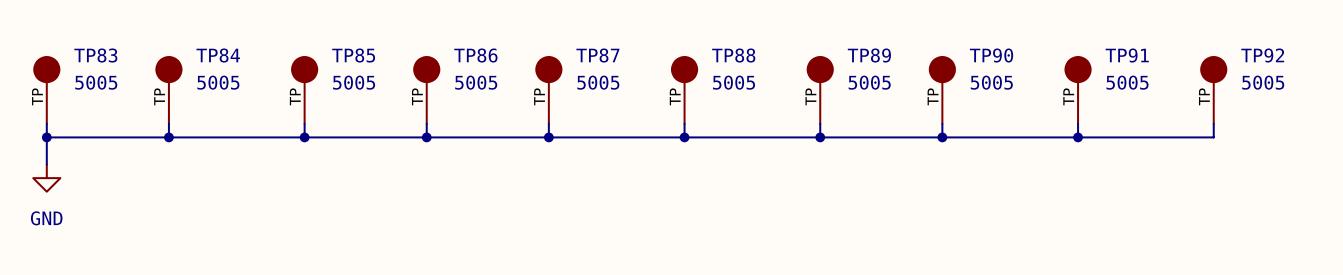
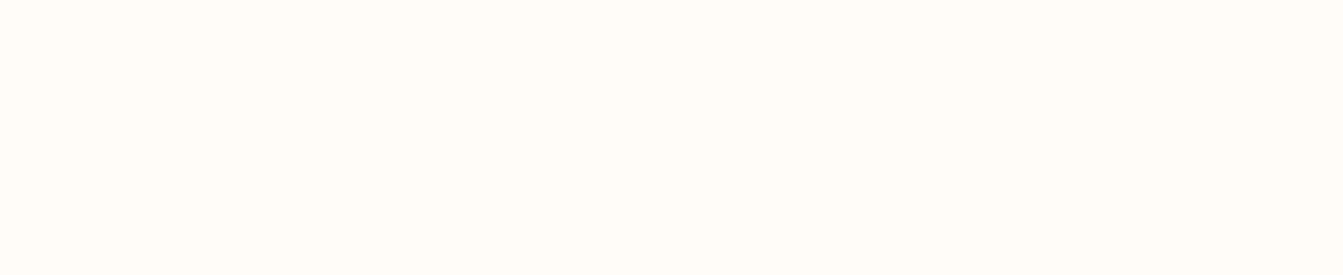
TP83: 5005 (46, 89) -> none
TP84: 5005 (168, 89) -> none
TP85: 5005 (304, 89) -> none
TP86: 5005 (426, 89) -> none
TP87: 5005 (548, 89) -> none
TP88: 5005 (684, 89) -> none
TP89: 5005 (820, 89) -> none
TP90: 5005 (942, 89) -> none
TP91: 5005 (1078, 89) -> none
TP92: 5005 (1213, 89) -> none
wire: (46, 123) (46, 164) -> none
wire: (168, 123) (168, 137) -> none
wire: (304, 123) (304, 137) -> none
wire: (426, 123) (426, 137) -> none
wire: (548, 123) (548, 137) -> none
wire: (684, 123) (684, 137) -> none
wire: (820, 123) (820, 137) -> none
wire: (942, 123) (942, 137) -> none
wire: (1078, 123) (1078, 137) -> none
wire: (1213, 123) (1213, 137) (46, 137) -> none
junction: (46, 137) -> none
junction: (168, 137) -> none
junction: (304, 137) -> none
junction: (426, 137) -> none
junction: (548, 137) -> none
junction: (684, 137) -> none
junction: (820, 137) -> none
junction: (942, 137) -> none
junction: (1078, 137) -> none
power symbol: GND (46, 178) -> none

